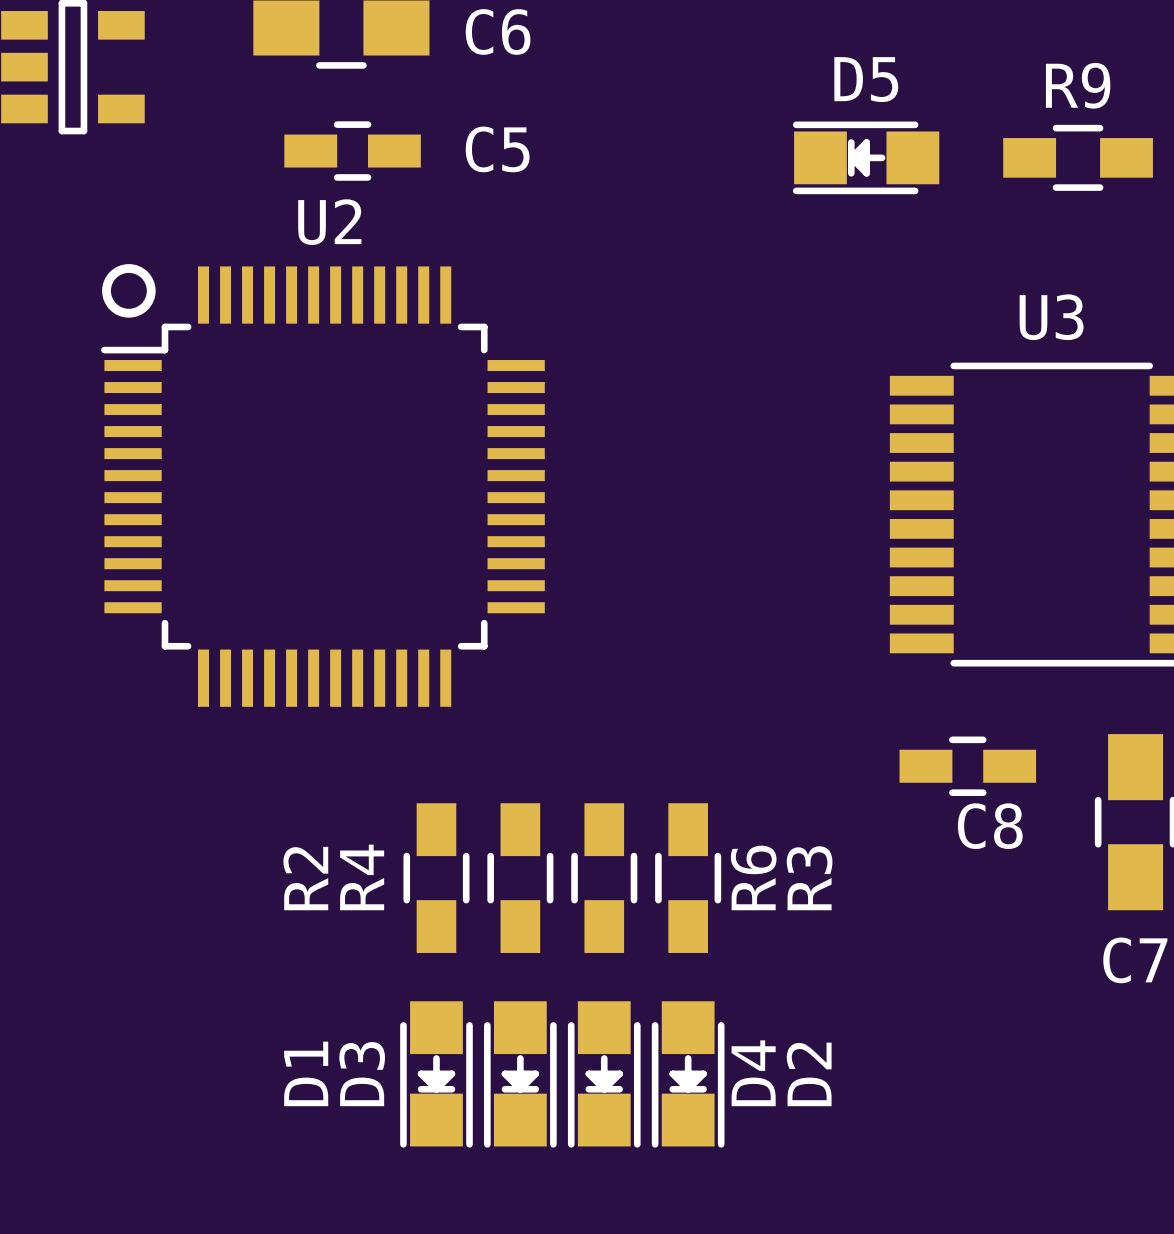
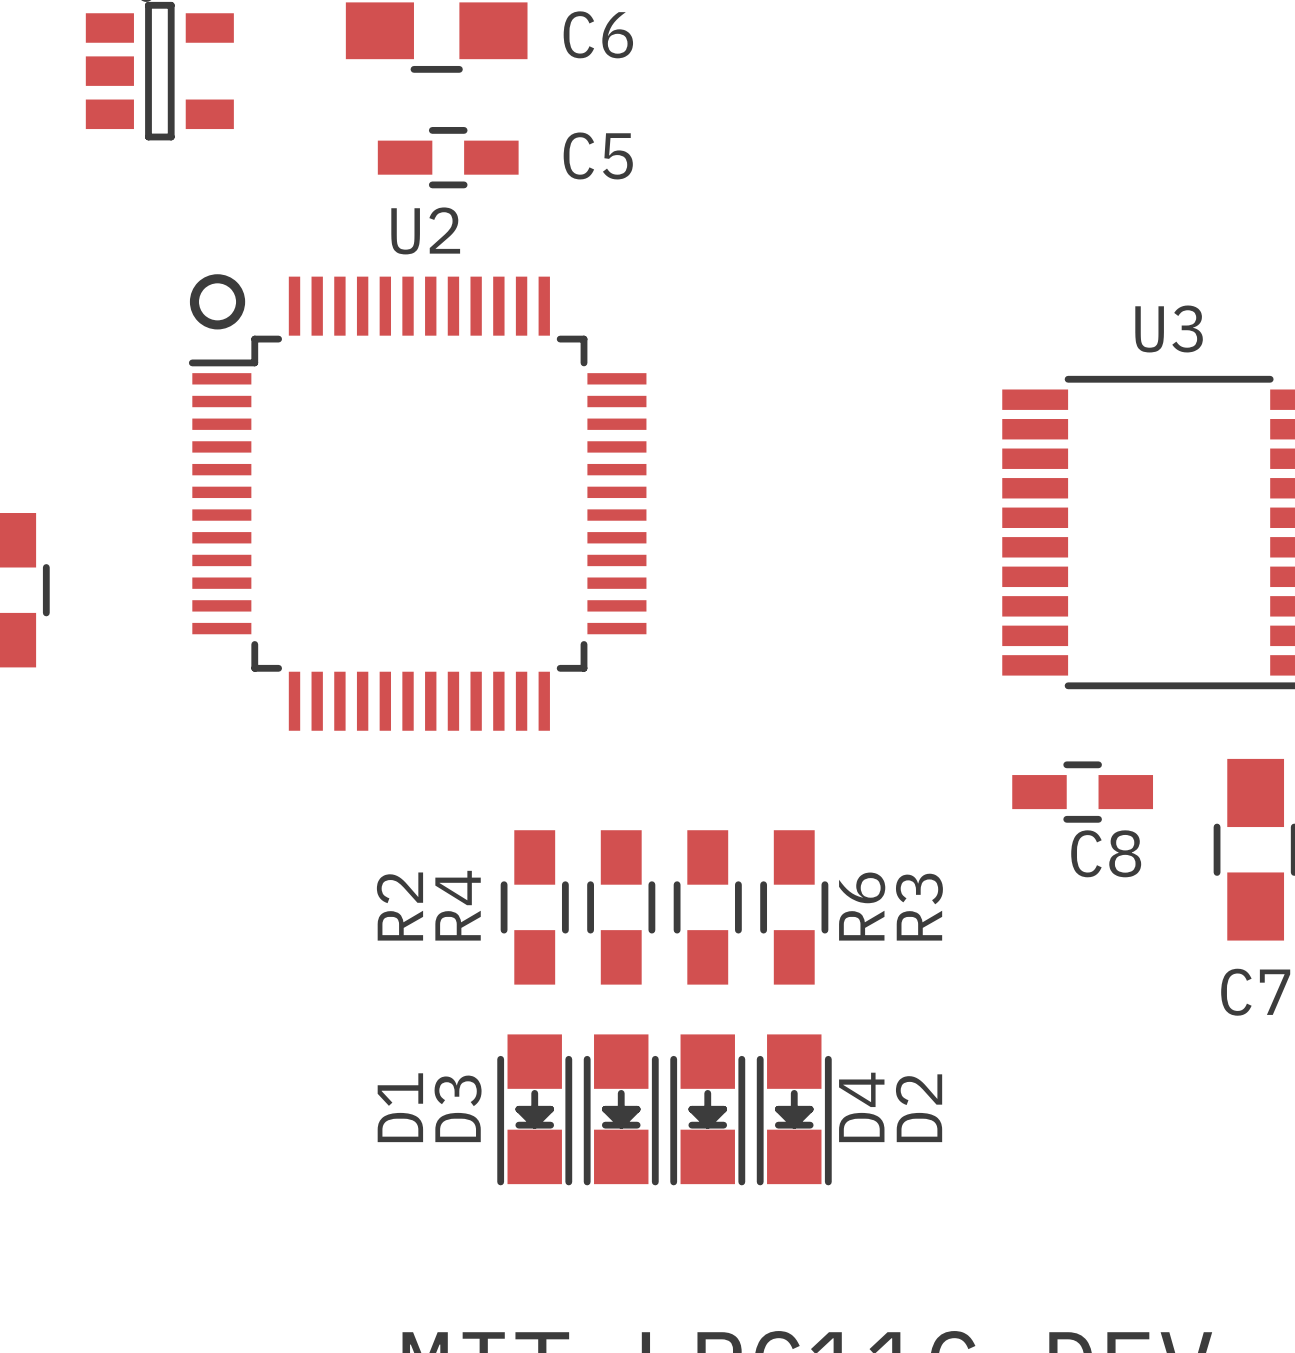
D5: (866, 157) -> none
R9: (1078, 157) -> none

